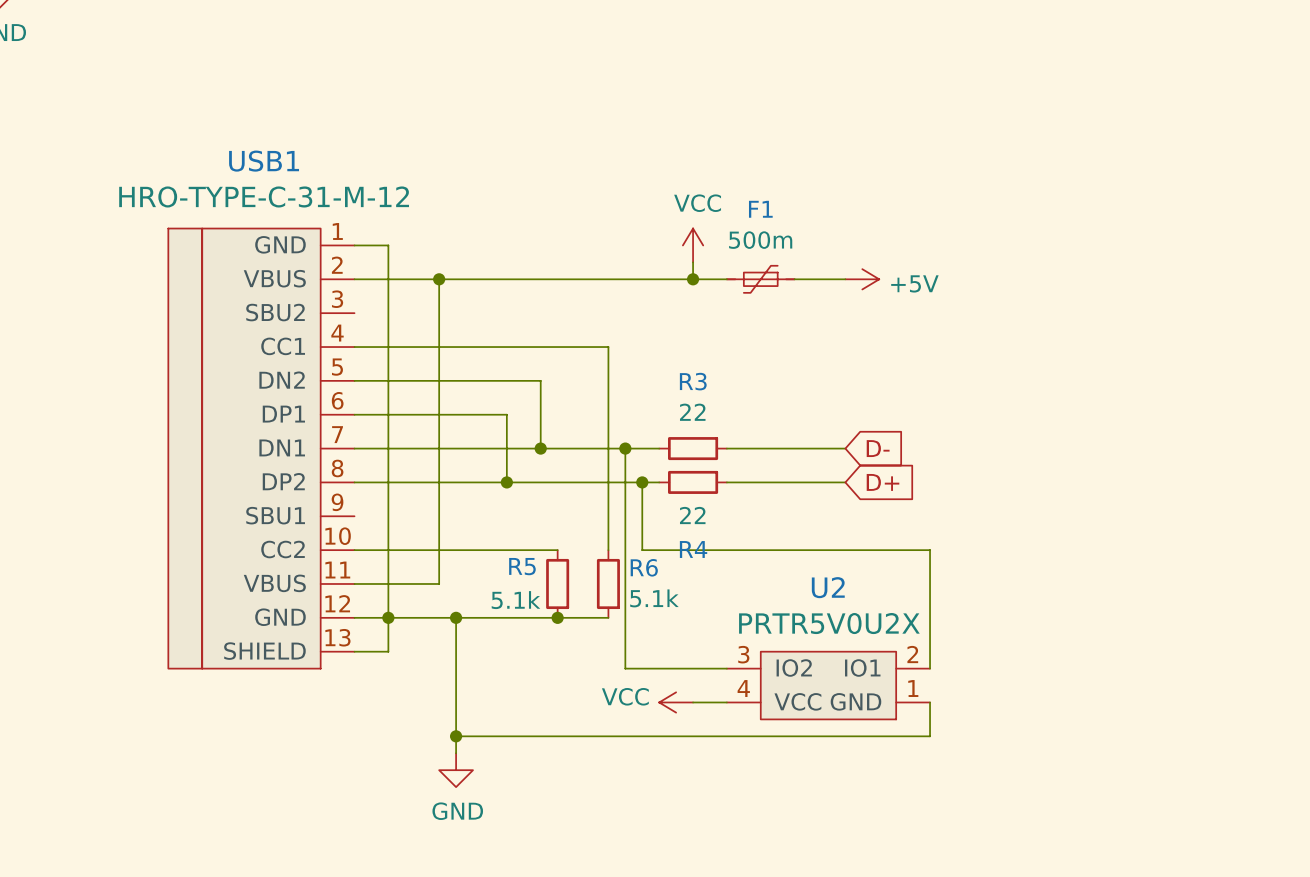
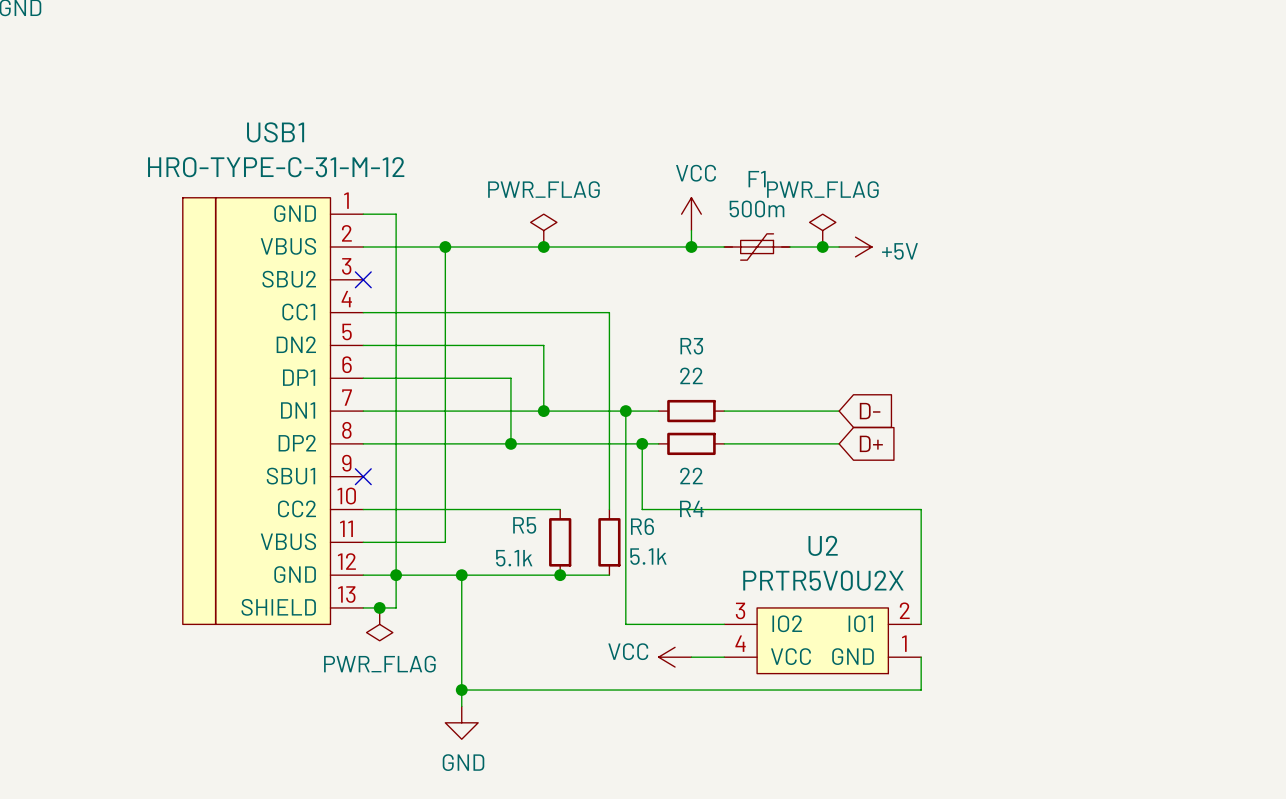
power symbol: none -> PWR_FLAG (543, 230)
power symbol: none -> PWR_FLAG (822, 230)
junction: none -> (543, 247)
junction: none -> (822, 247)
no-connect mark: none -> (363, 279)
no-connect mark: none -> (363, 476)
junction: none -> (379, 607)
power symbol: none -> PWR_FLAG (379, 624)

